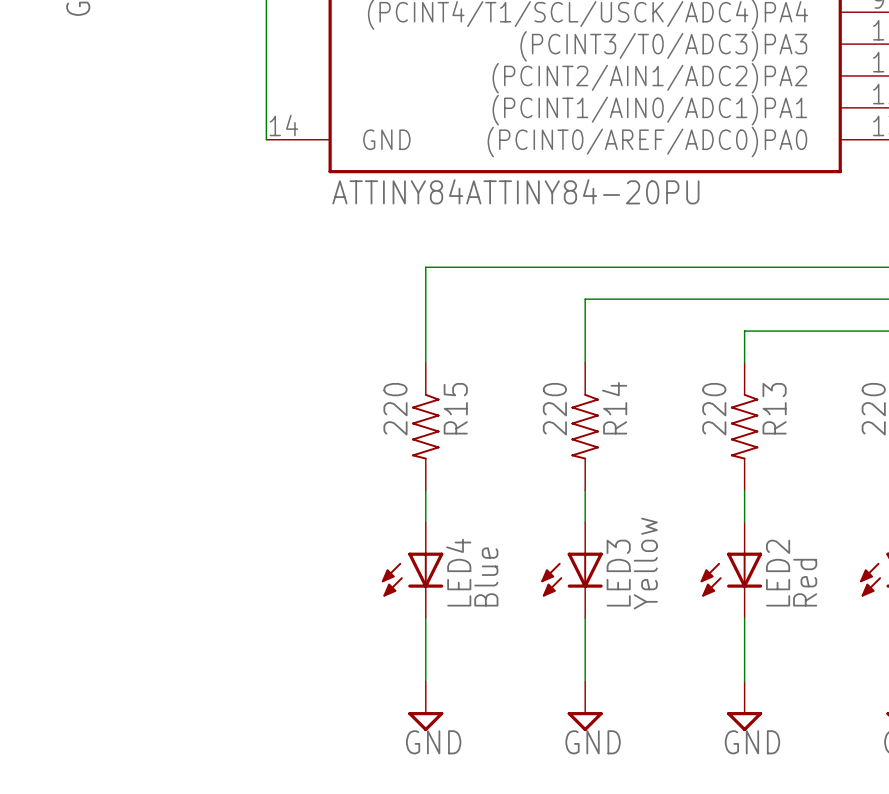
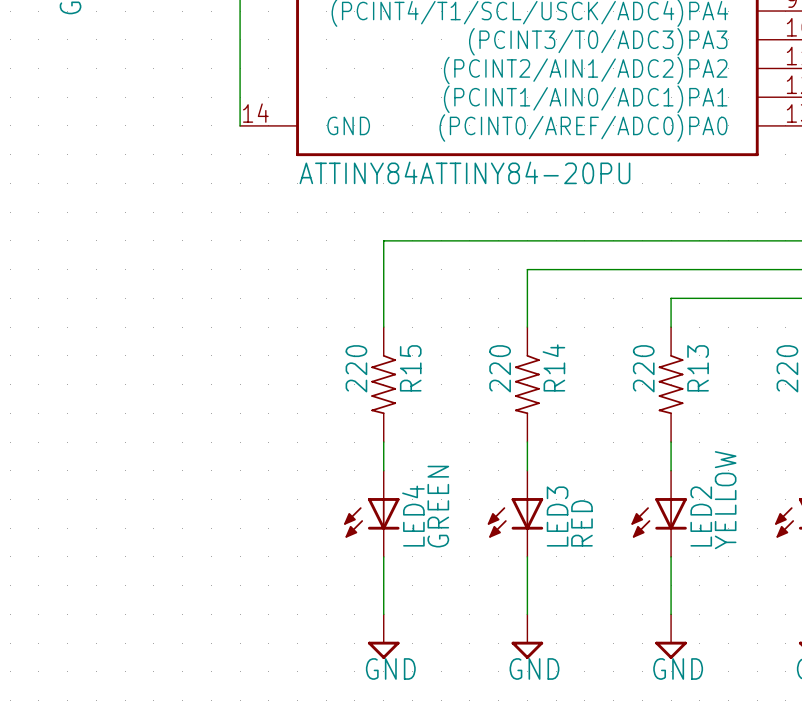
LED3 value: Yellow (645, 563) -> RED (581, 523)
LED4 value: Blue (486, 576) -> GREEN (438, 506)
LED2 value: Red (805, 582) -> YELLOW (725, 500)

